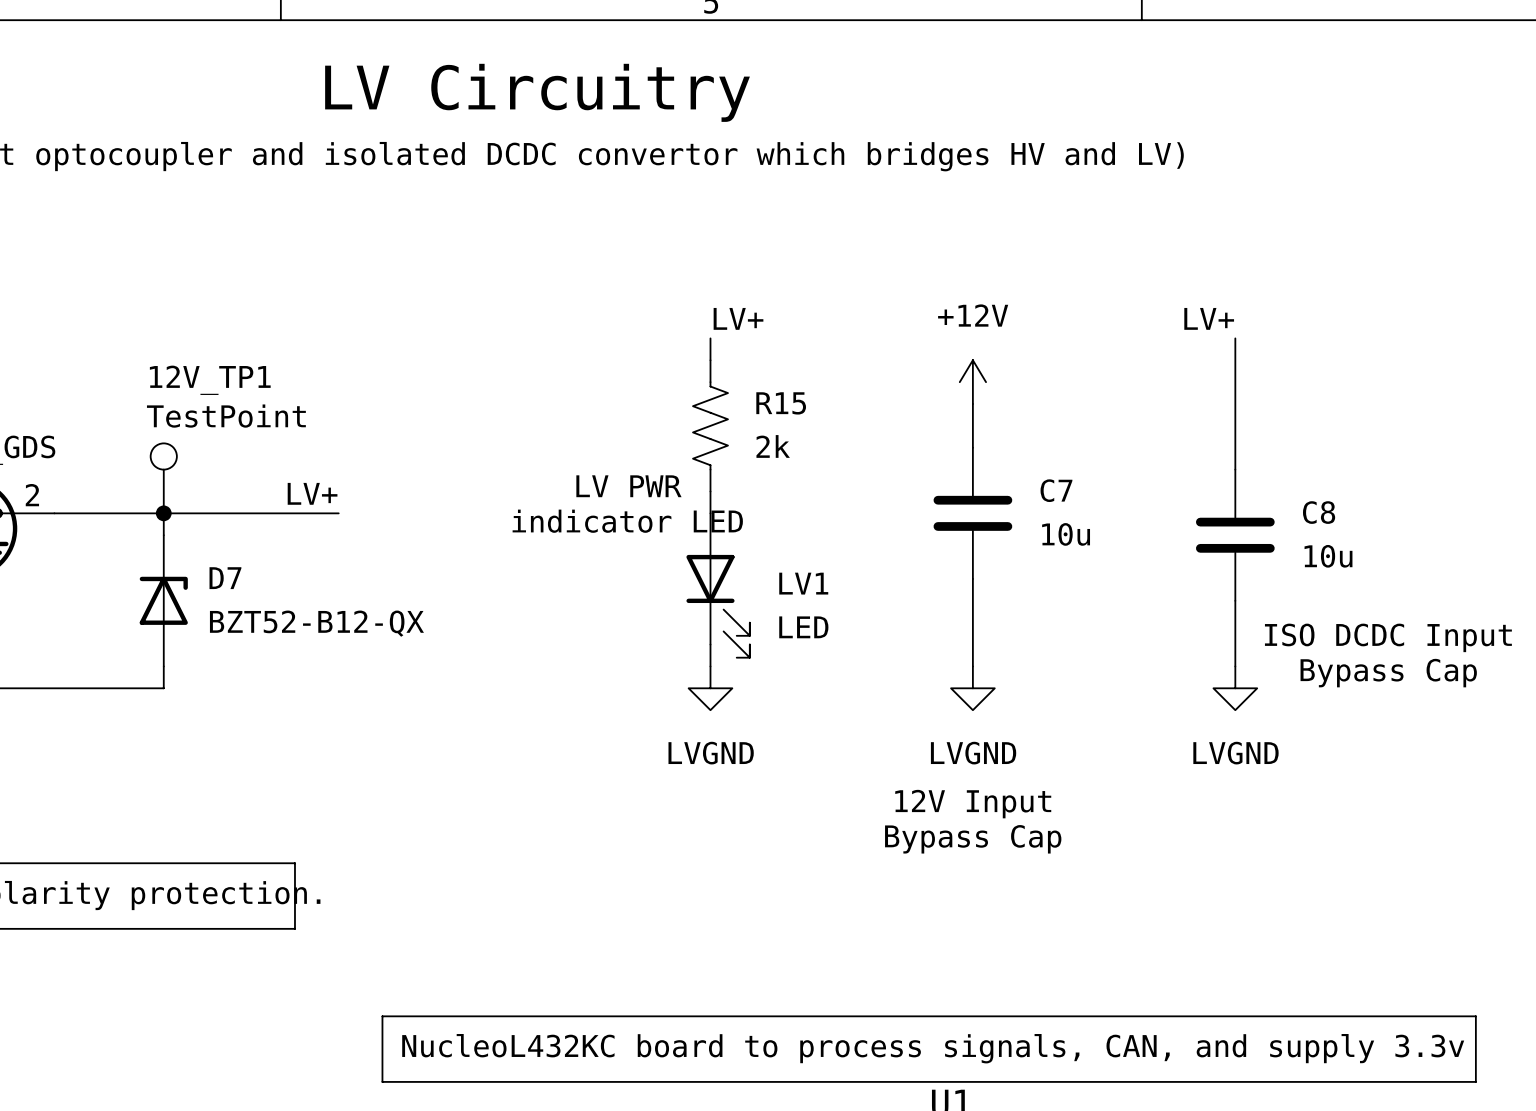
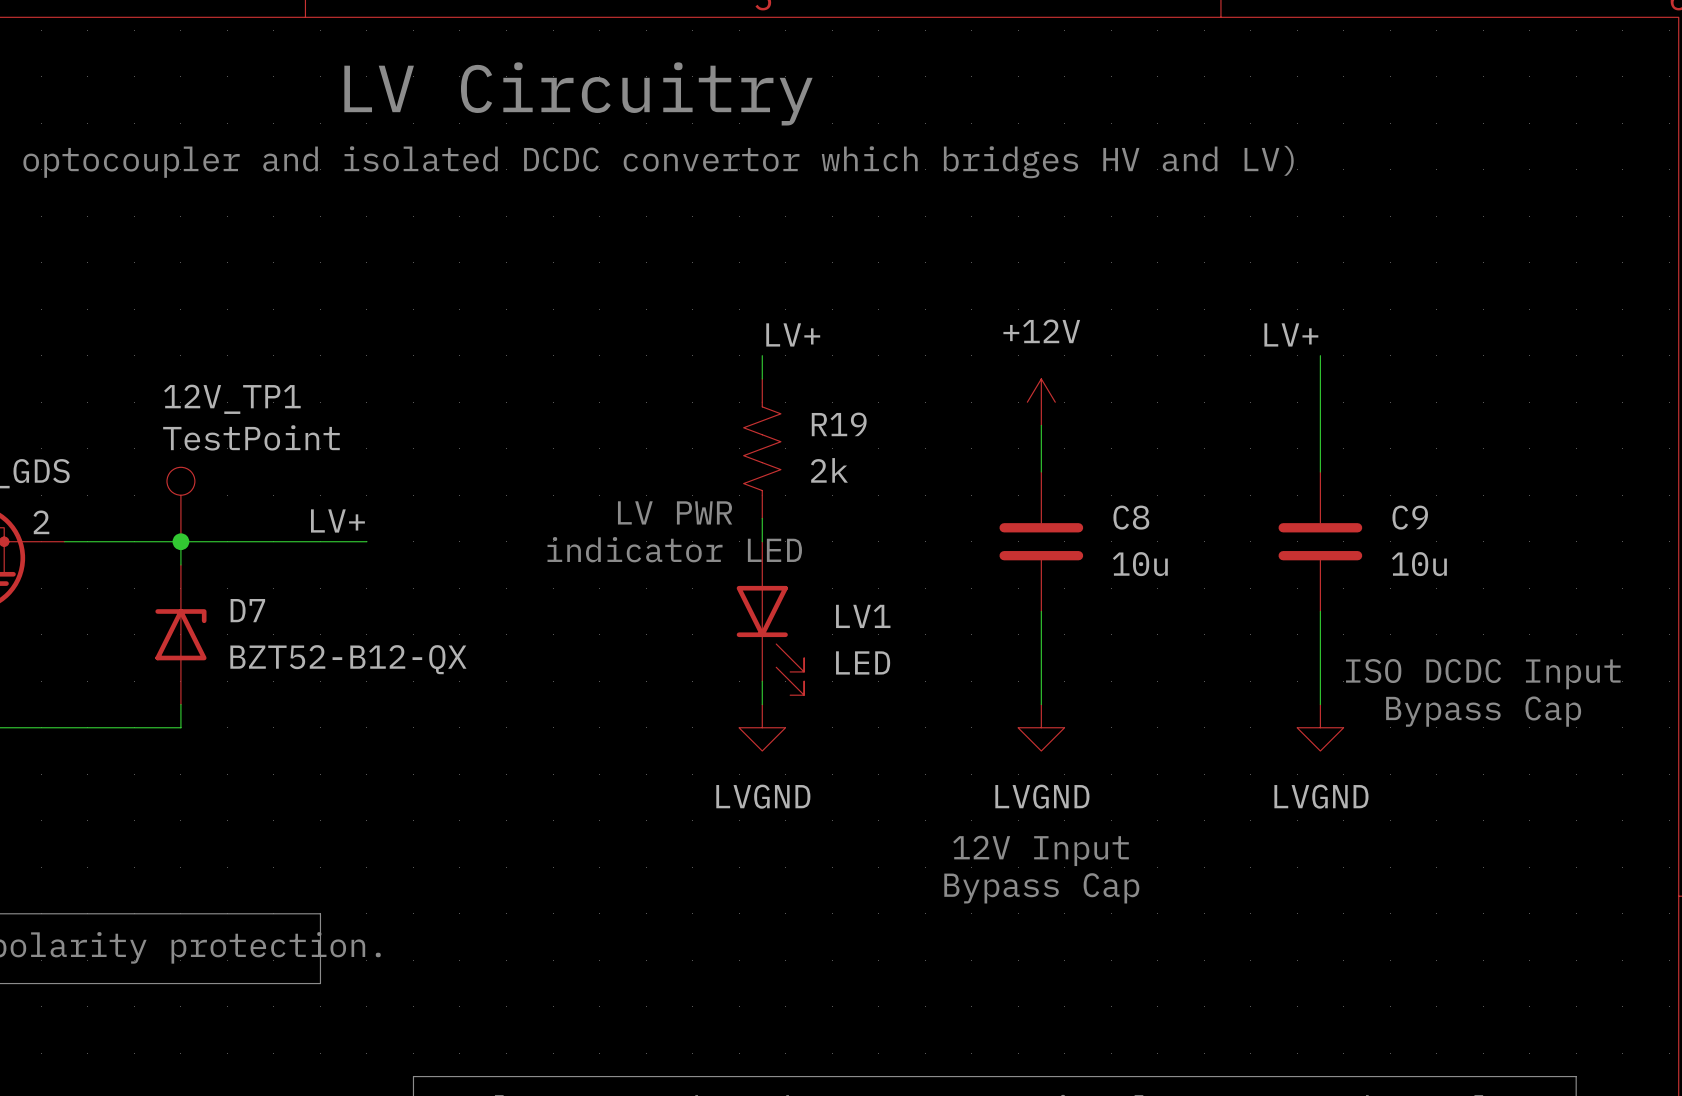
R15 name: R15 (781, 403) -> R19 (839, 424)
C7 name: C7 (1056, 490) -> C8 (1131, 517)
C9: none -> 10u (1320, 541)
C8: 10u (1235, 535) -> none

